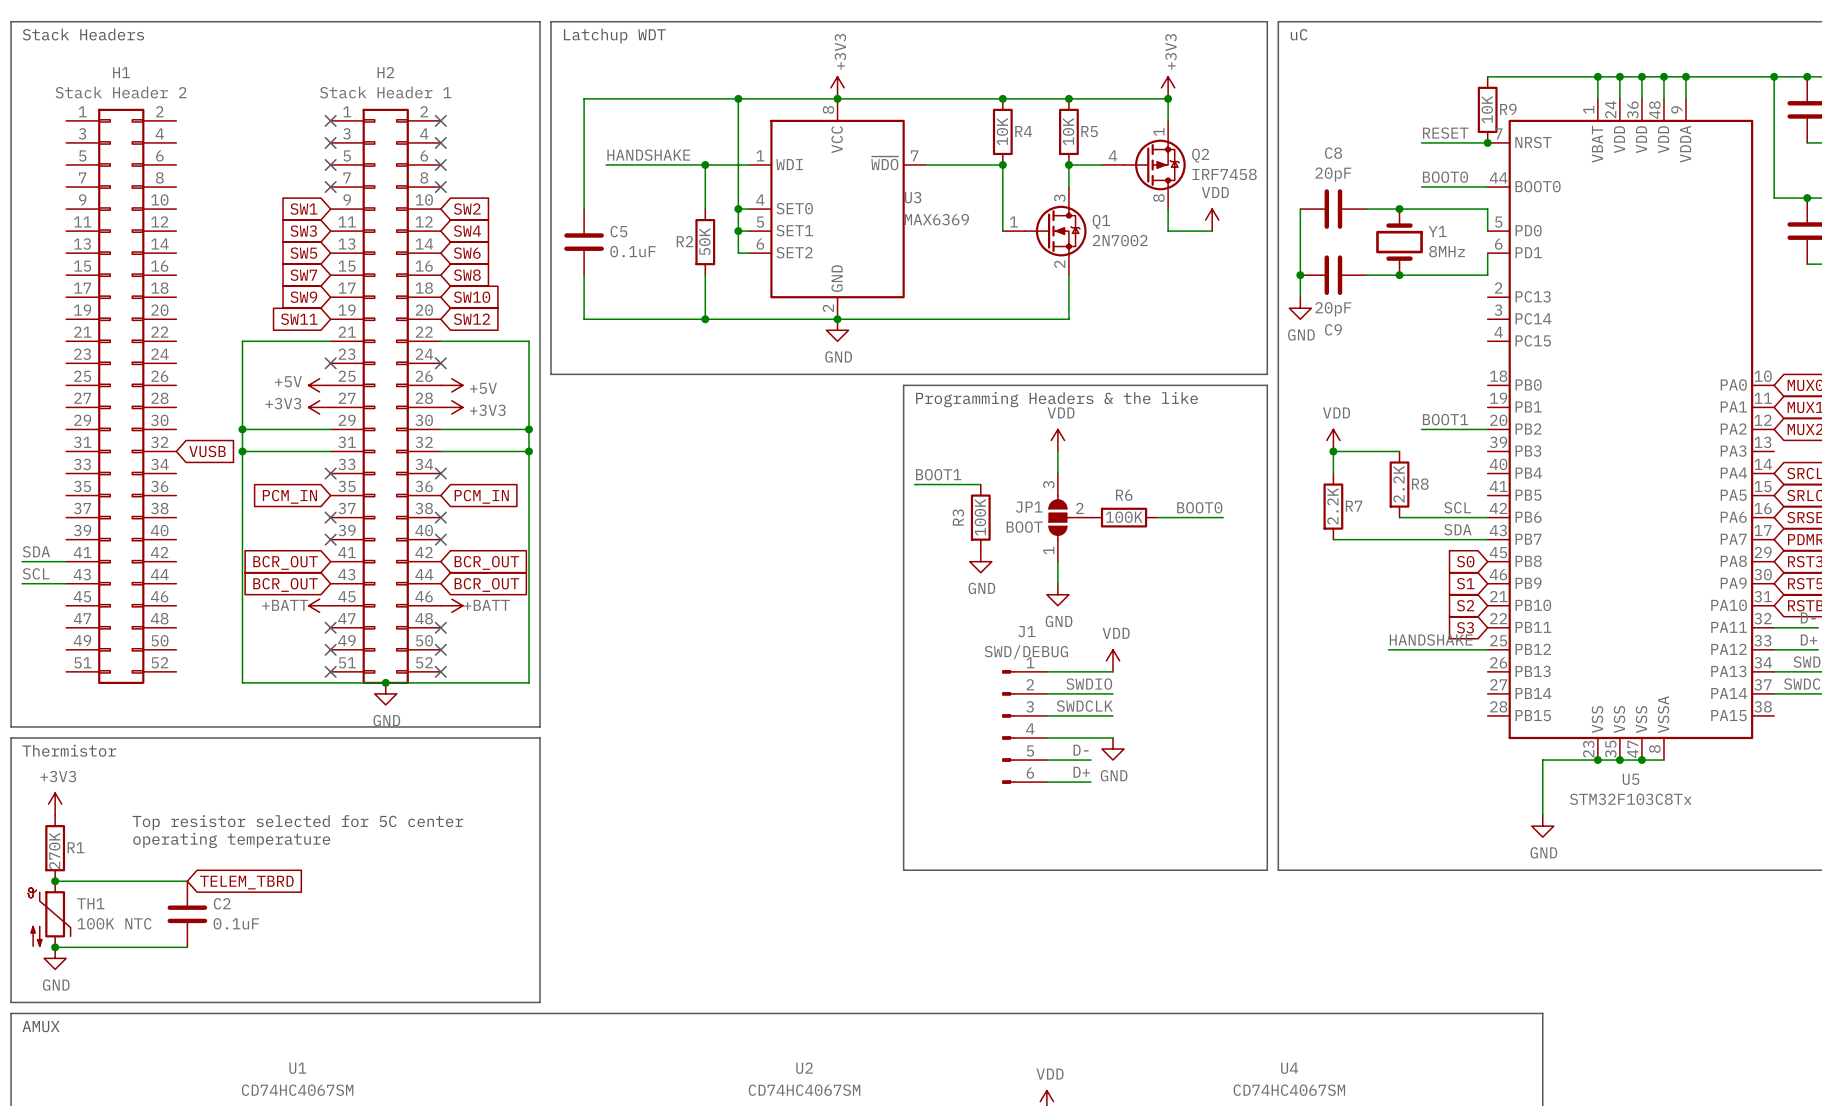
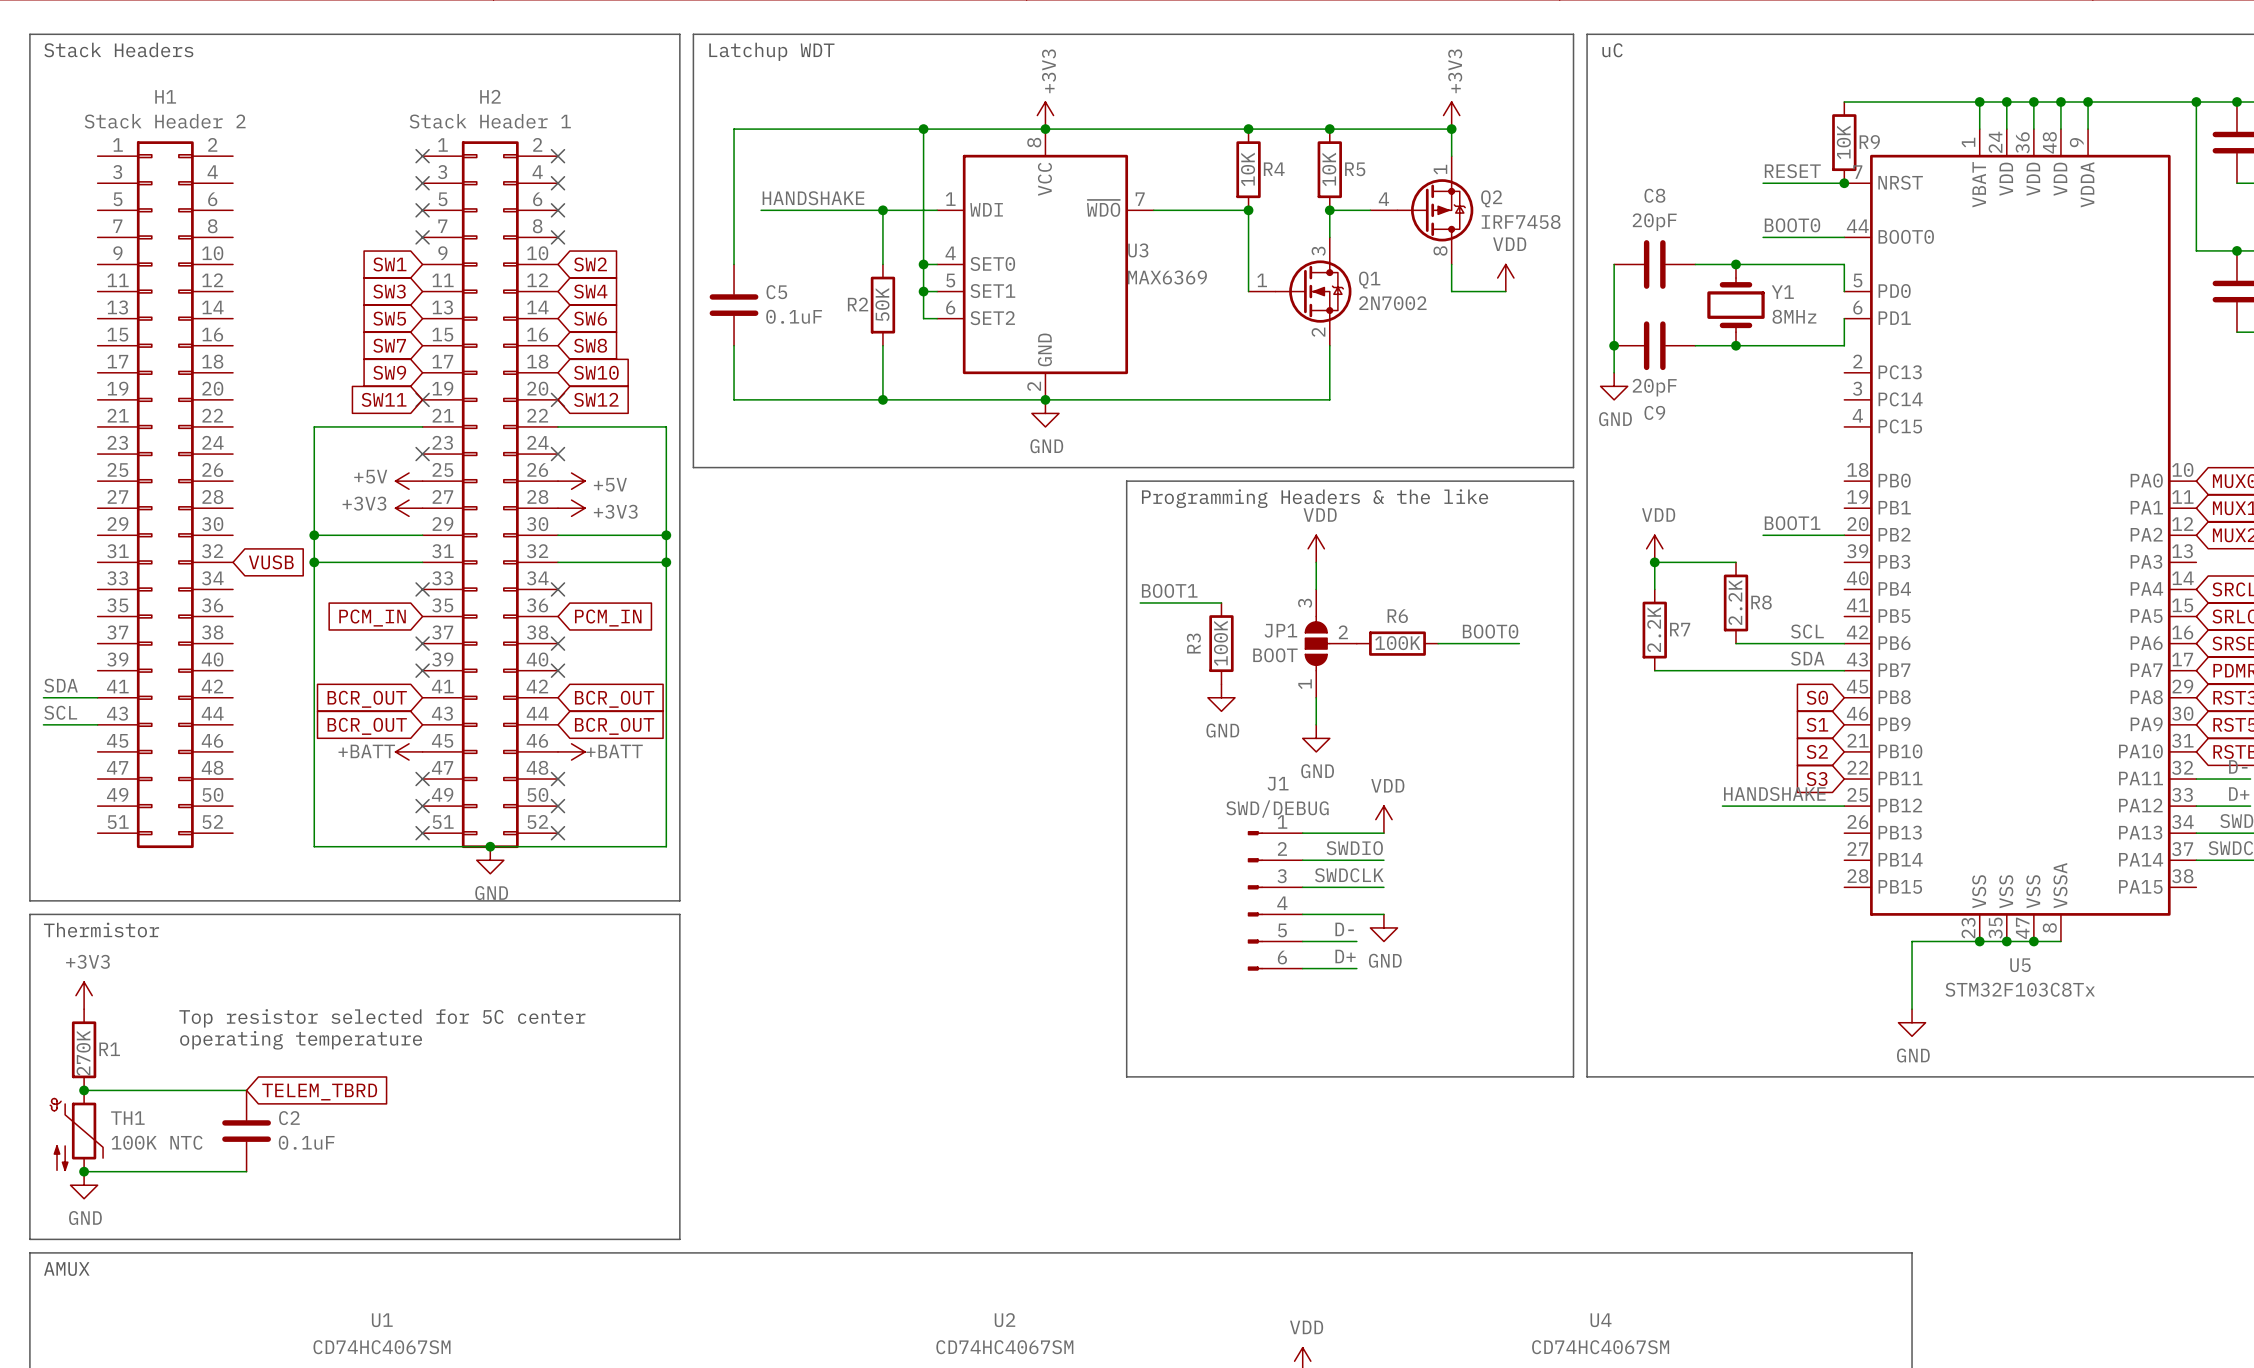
no-connect mark: none -> (422, 399)
no-connect mark: none -> (557, 399)

